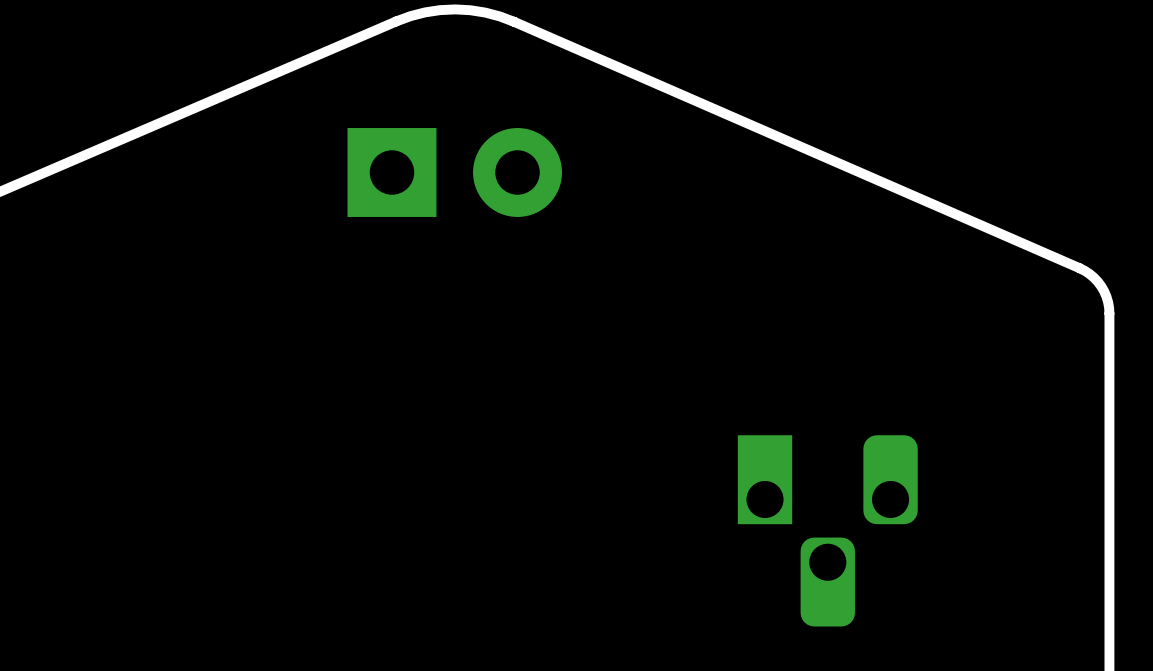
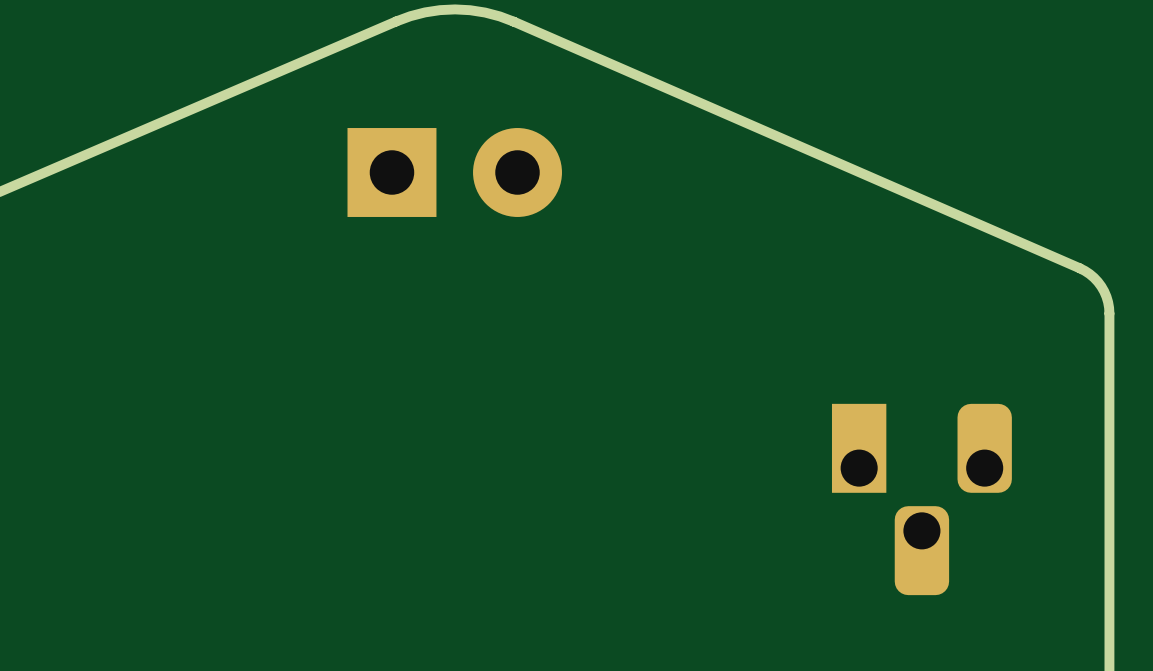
part position: (827, 530) -> (921, 499)

